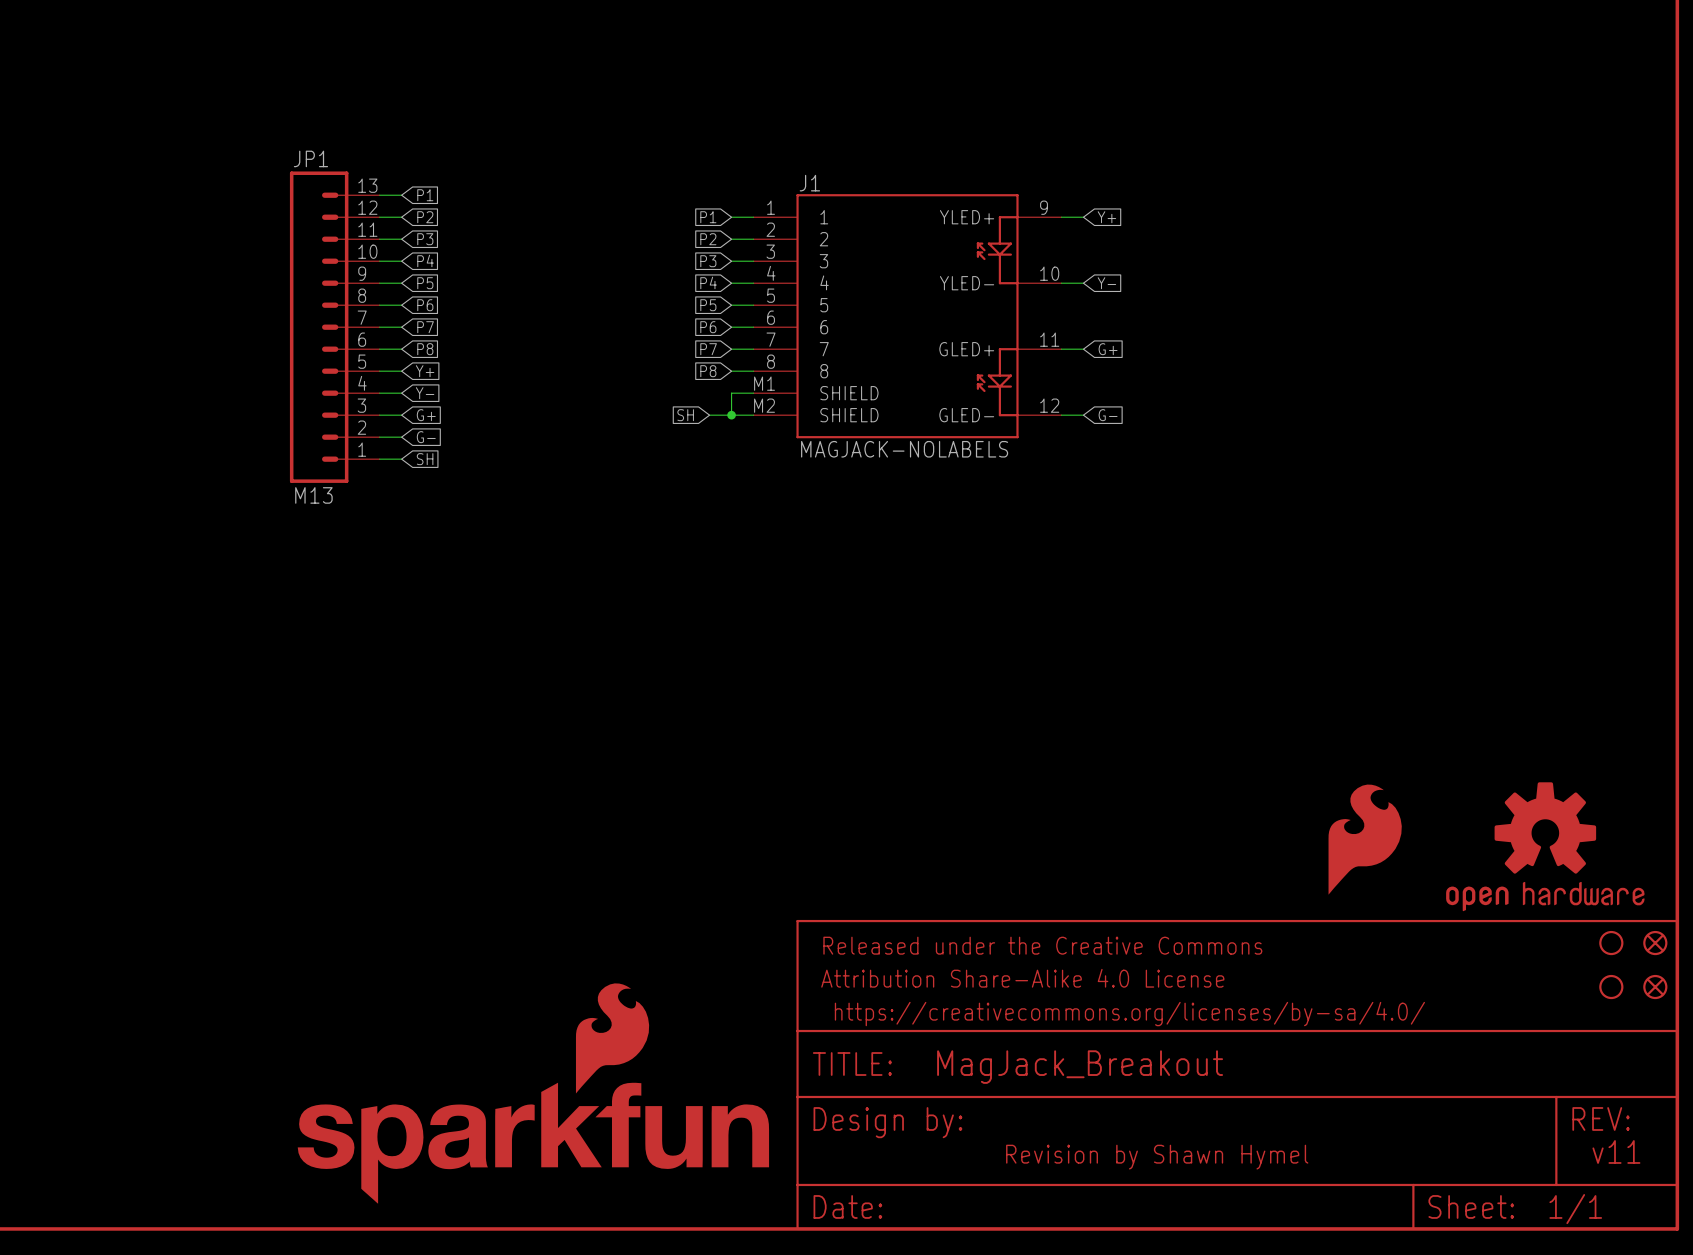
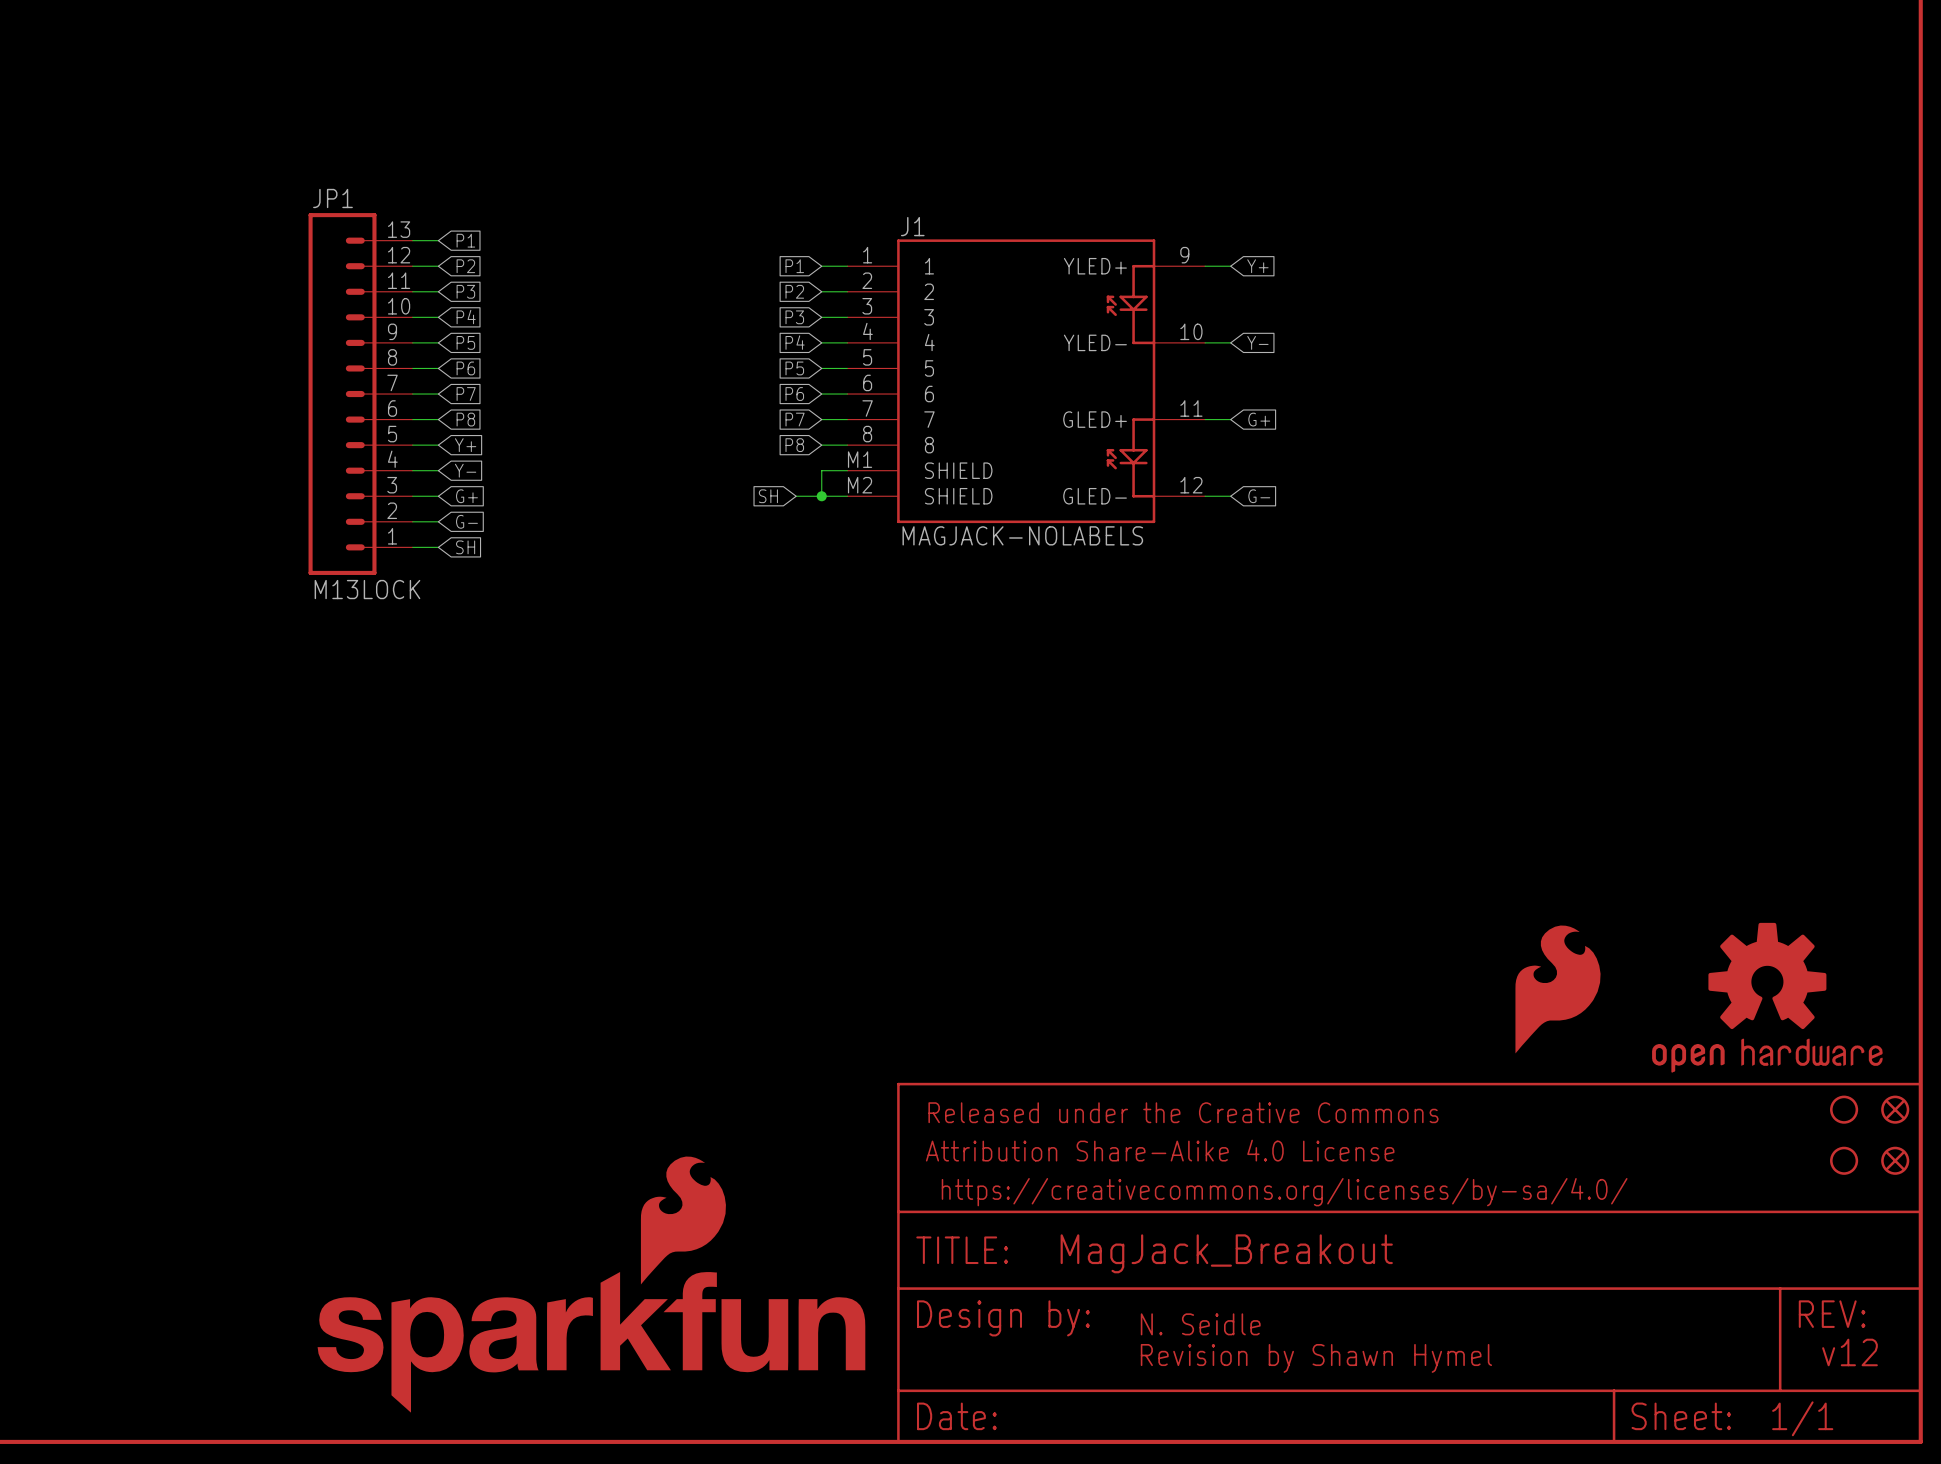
JP1 value: M13 (313, 495) -> M13LOCK (367, 589)
text: none -> N. Seidle (1200, 1324)
text: v11 (1616, 1151) -> v12 (1850, 1352)

